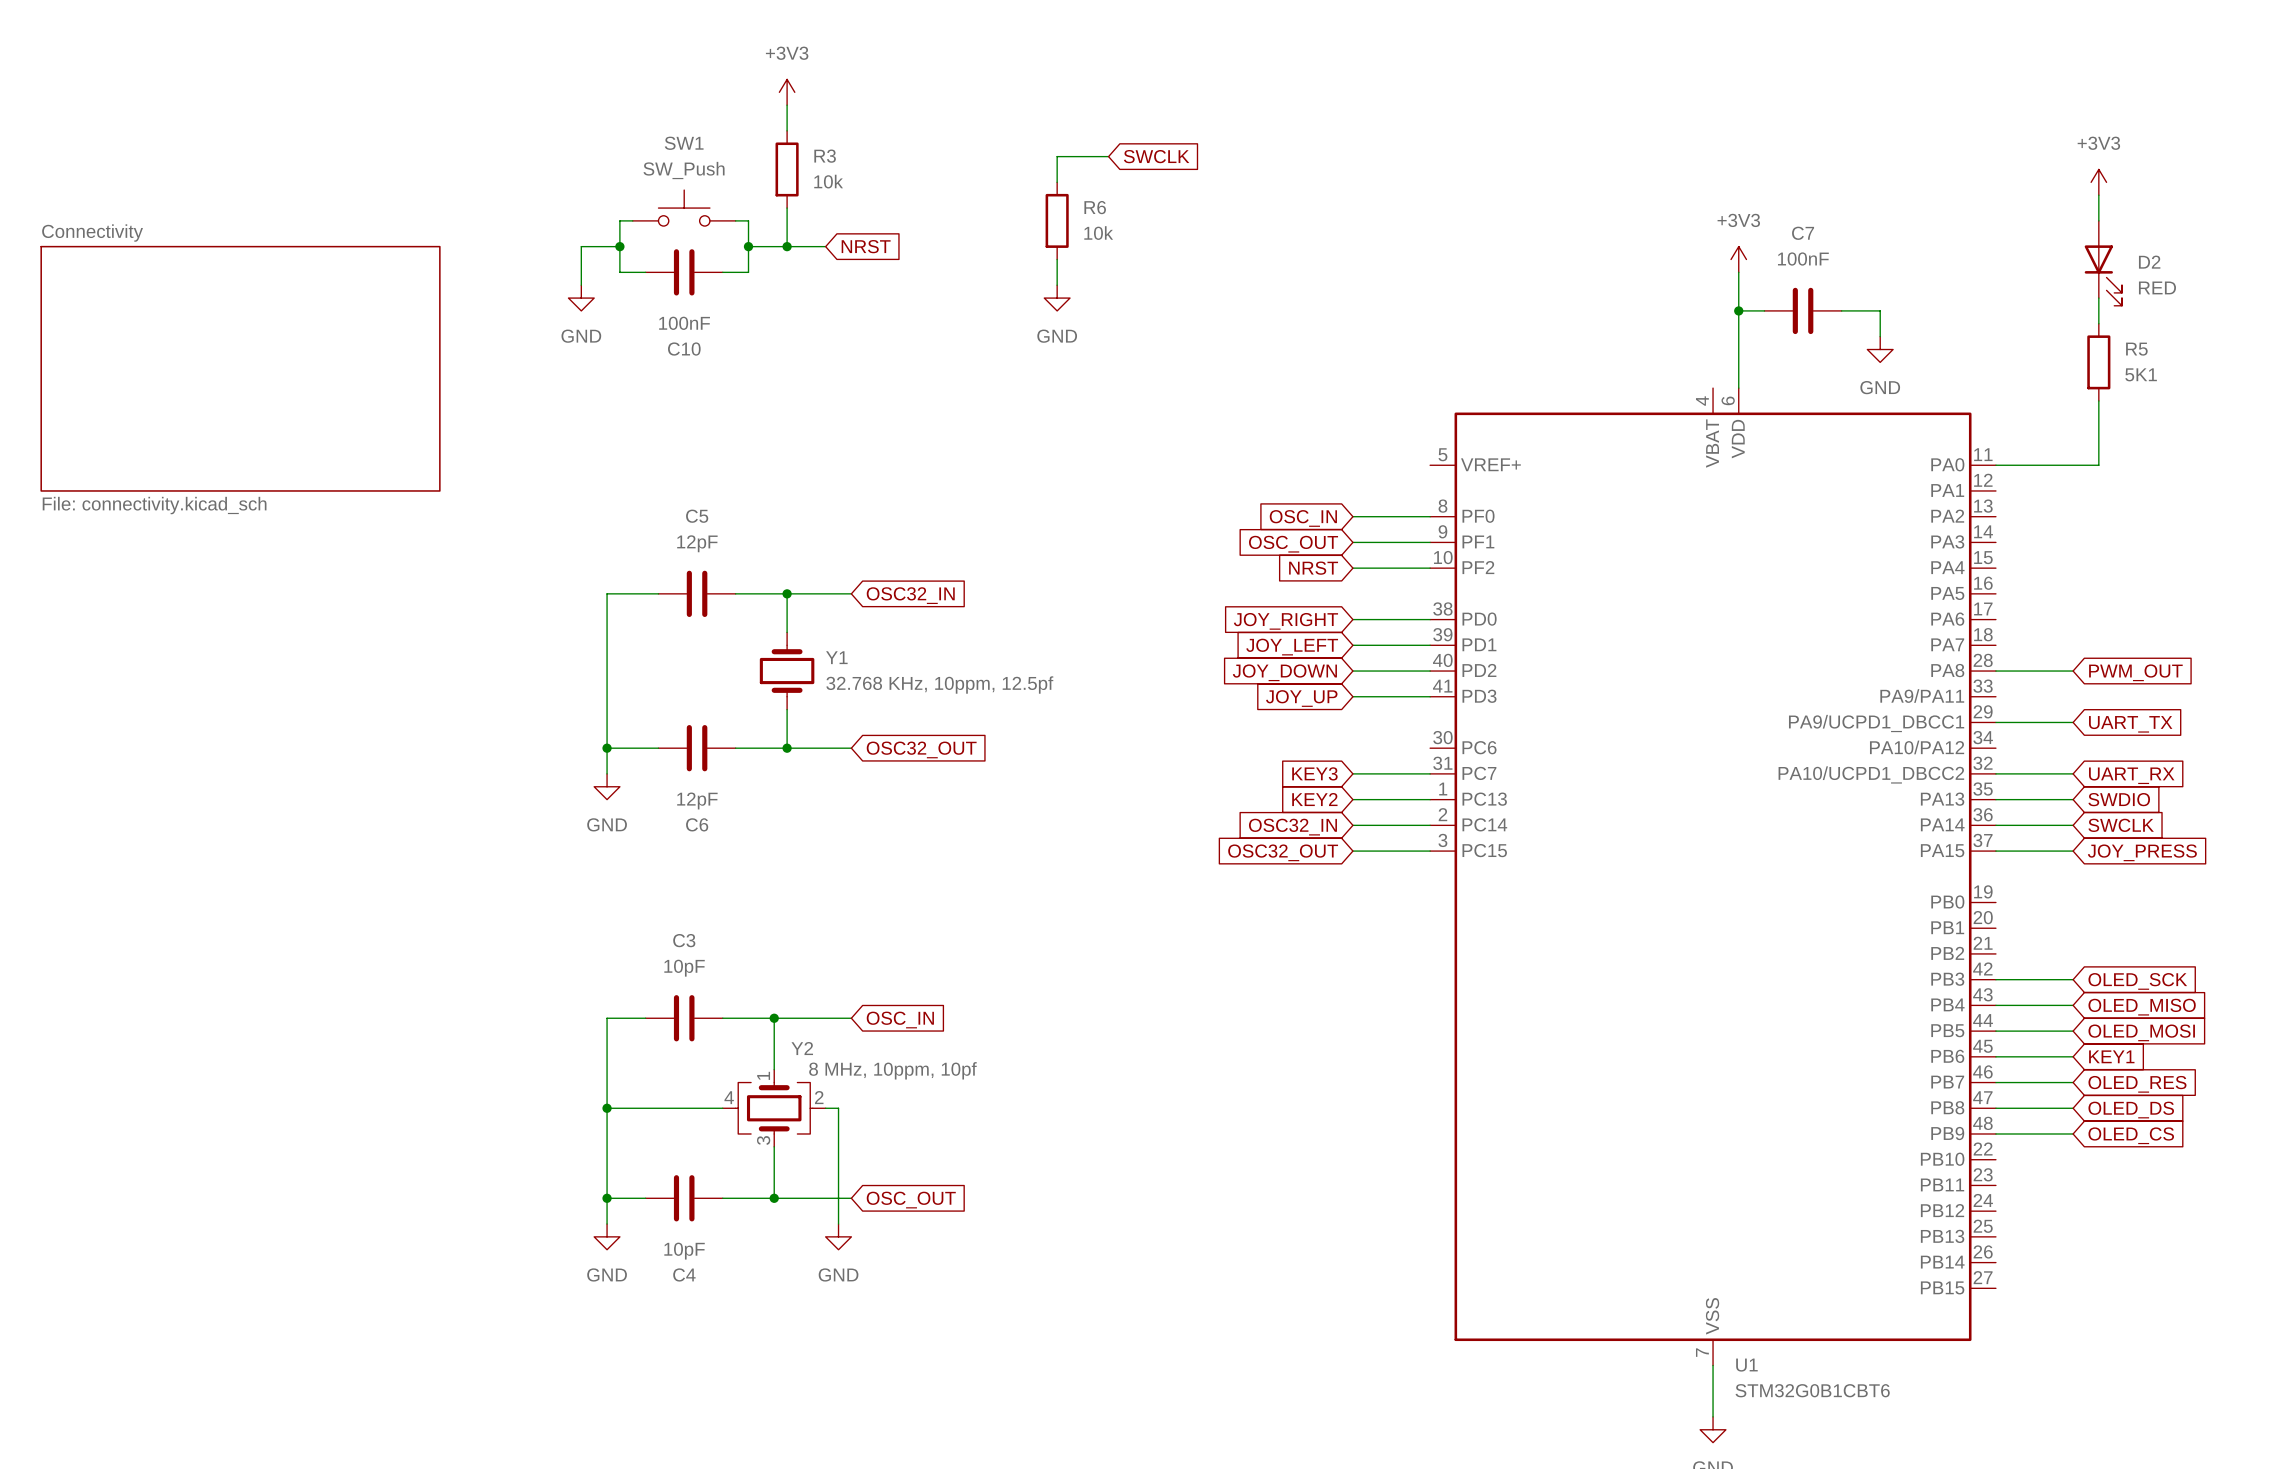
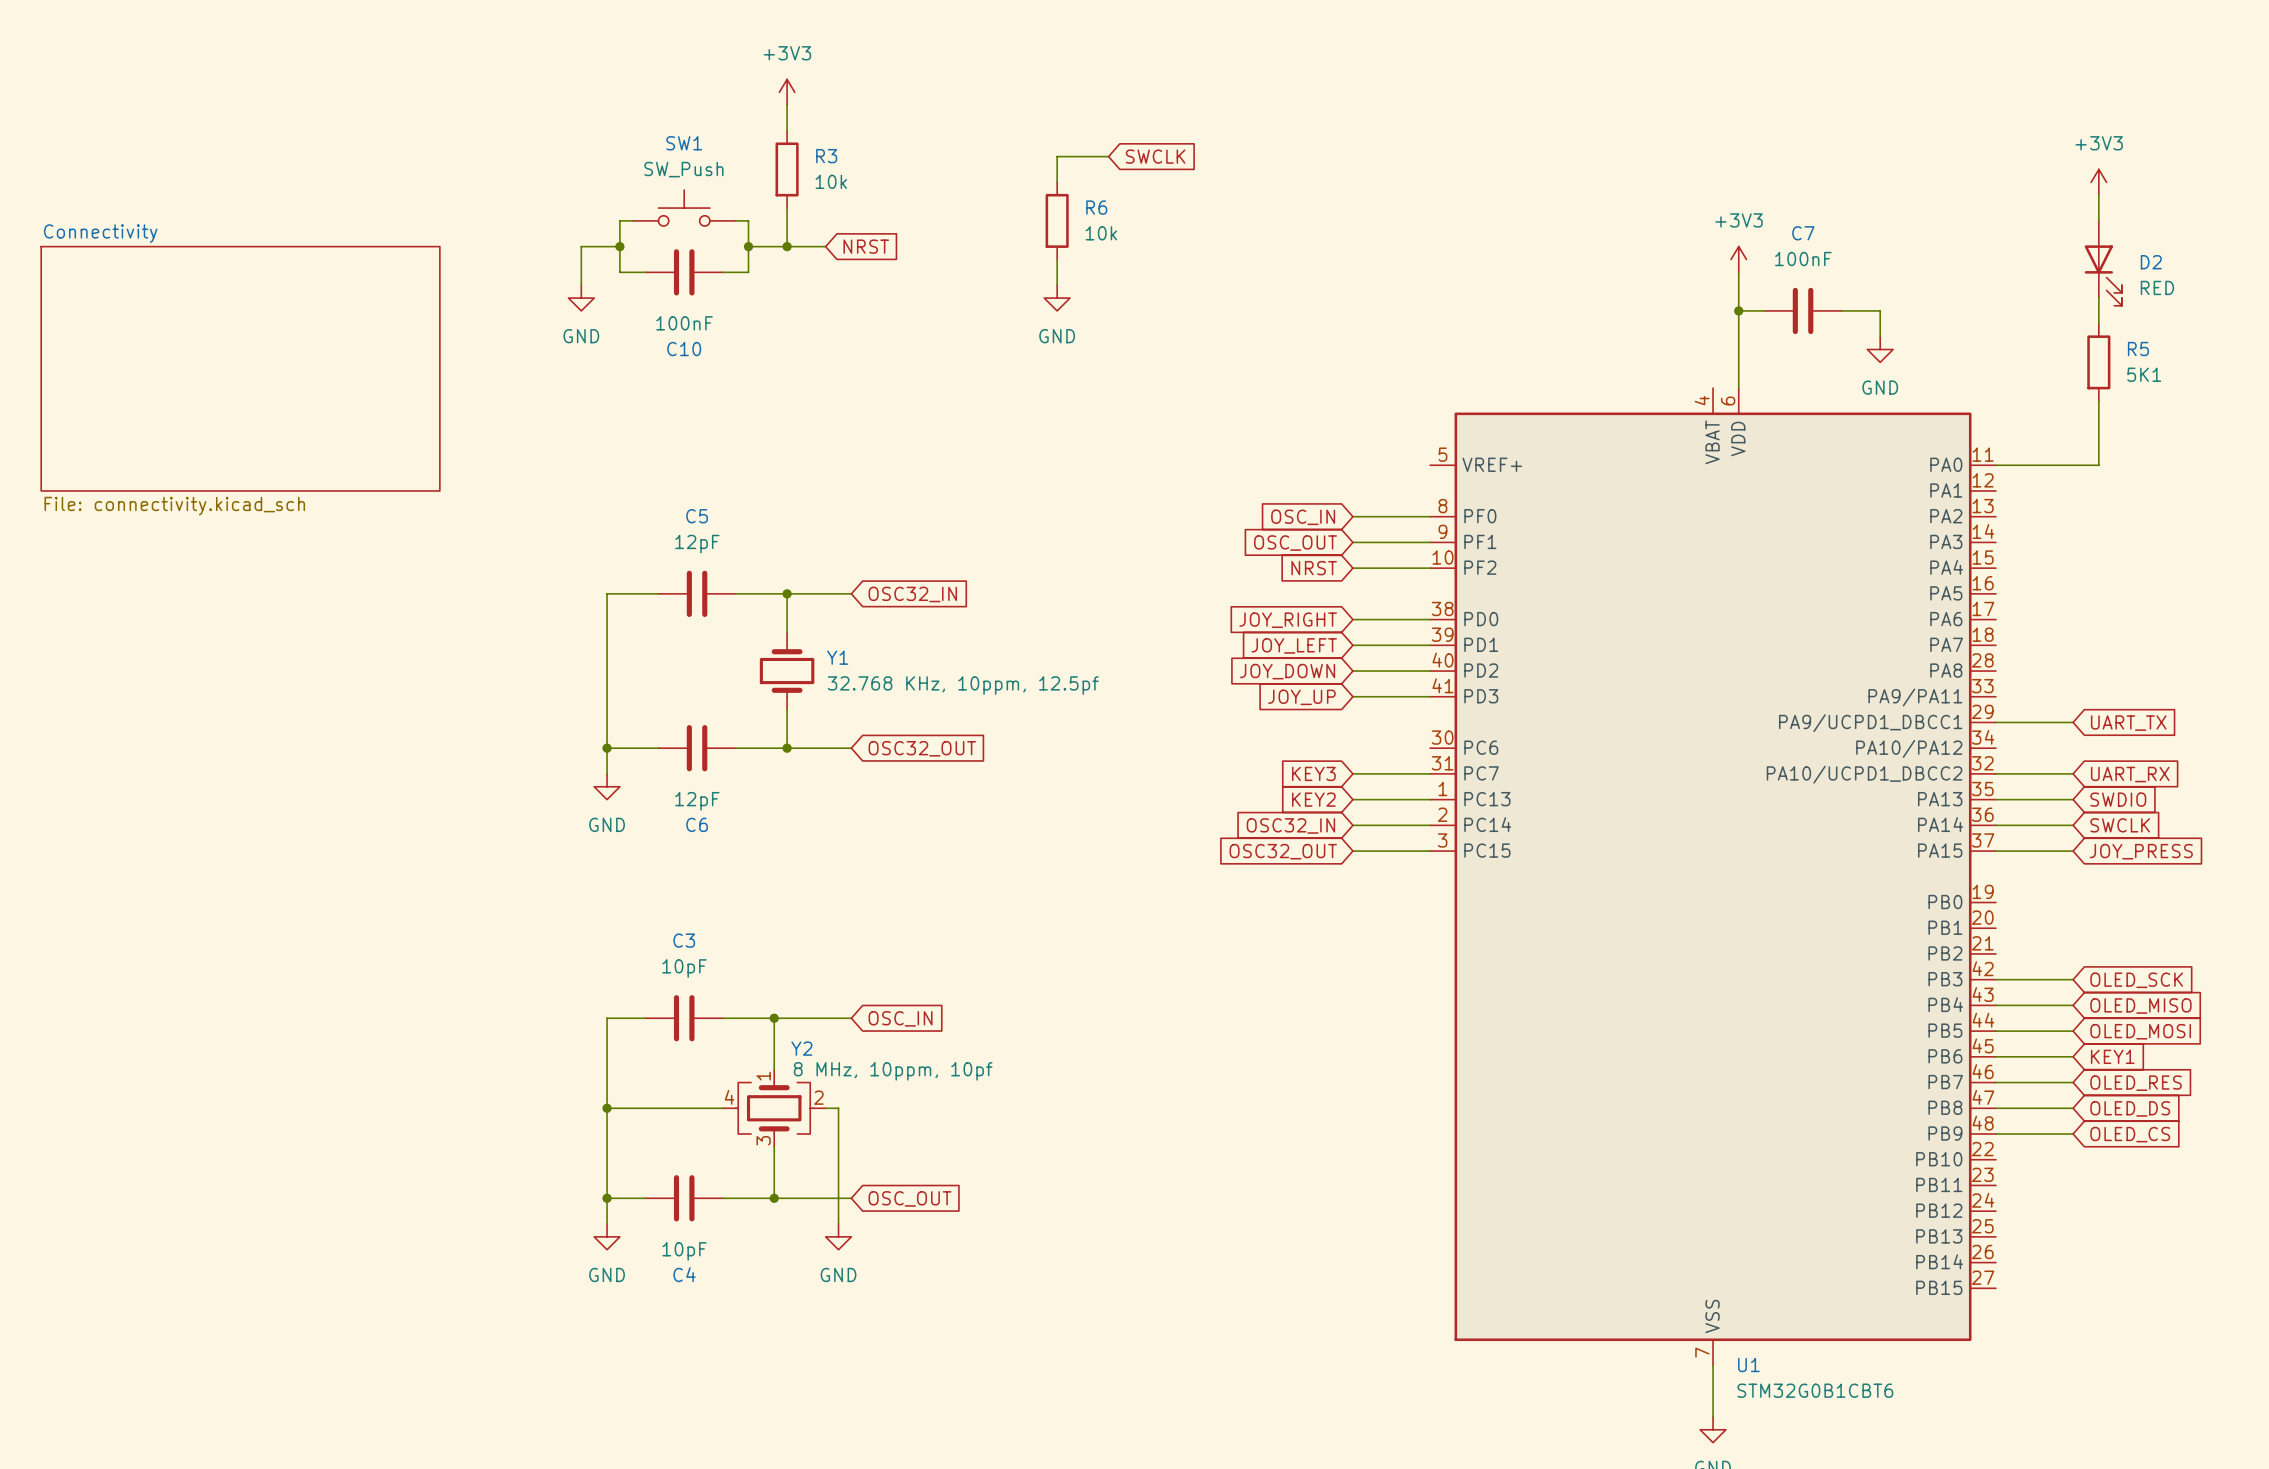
wire: (1995, 671) (2073, 671) -> none
global label: PWM_OUT (2135, 672) -> none

